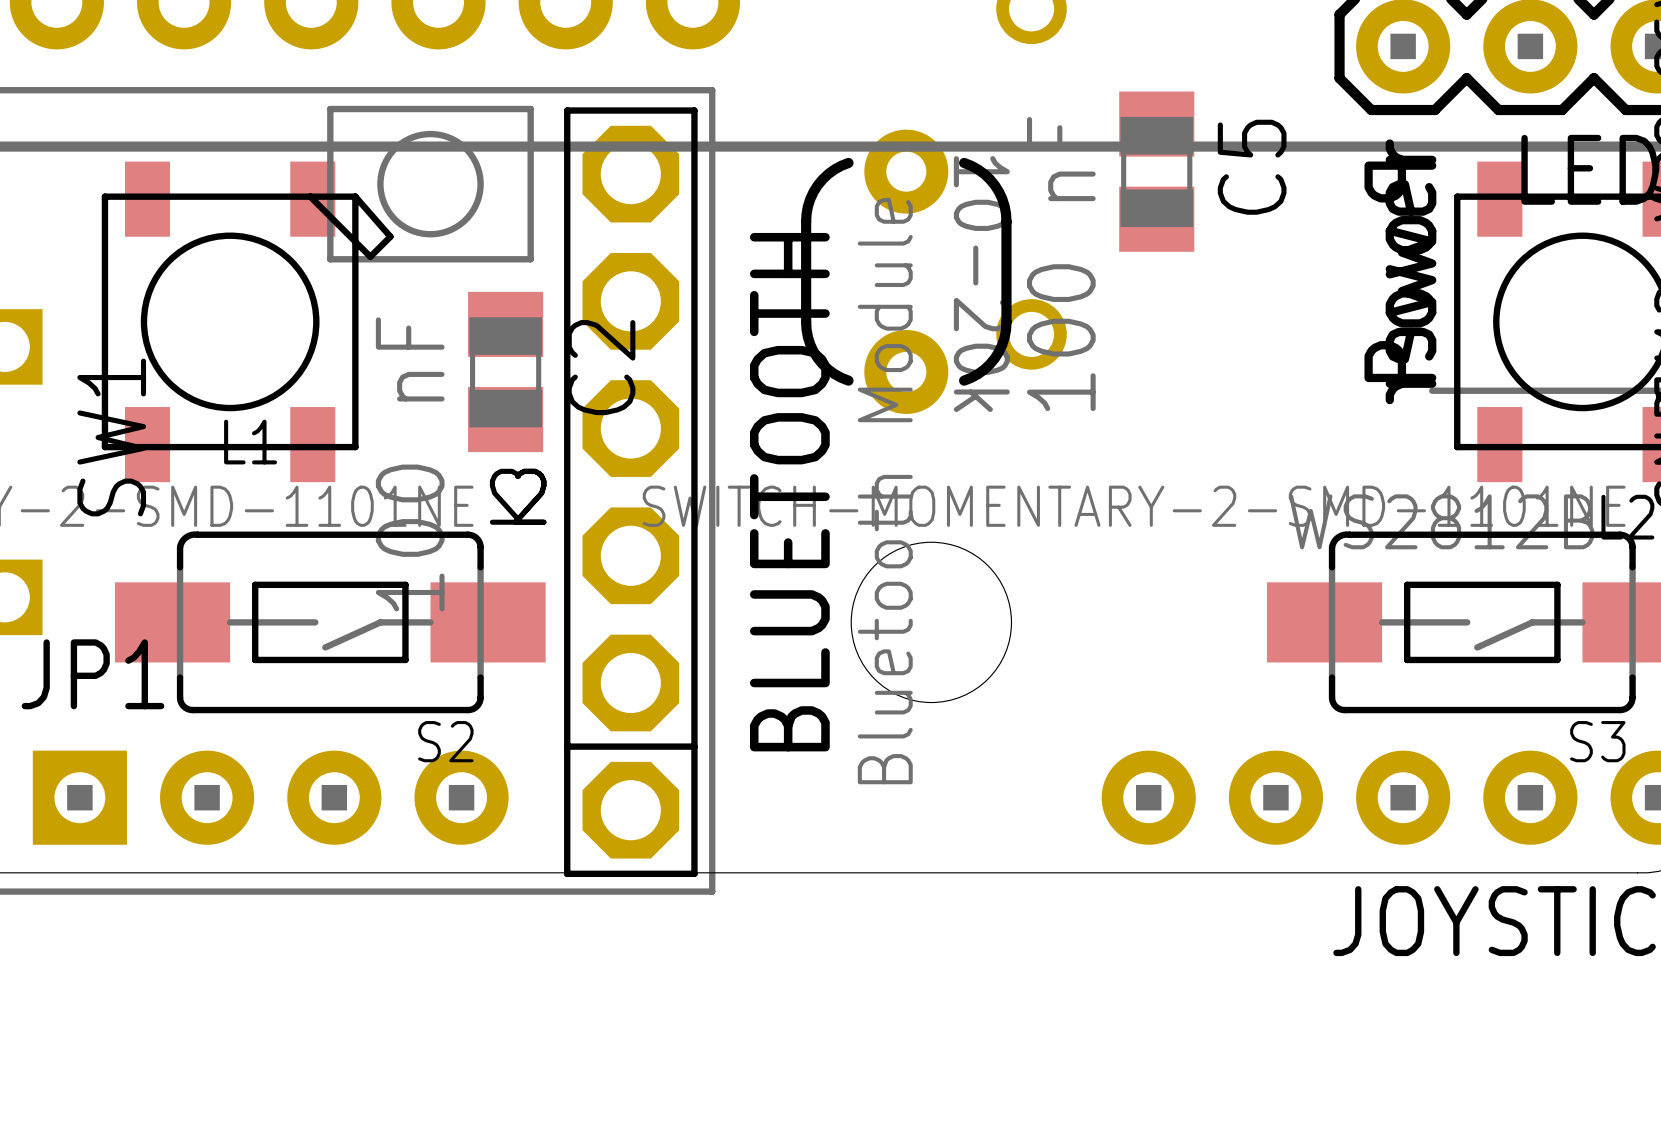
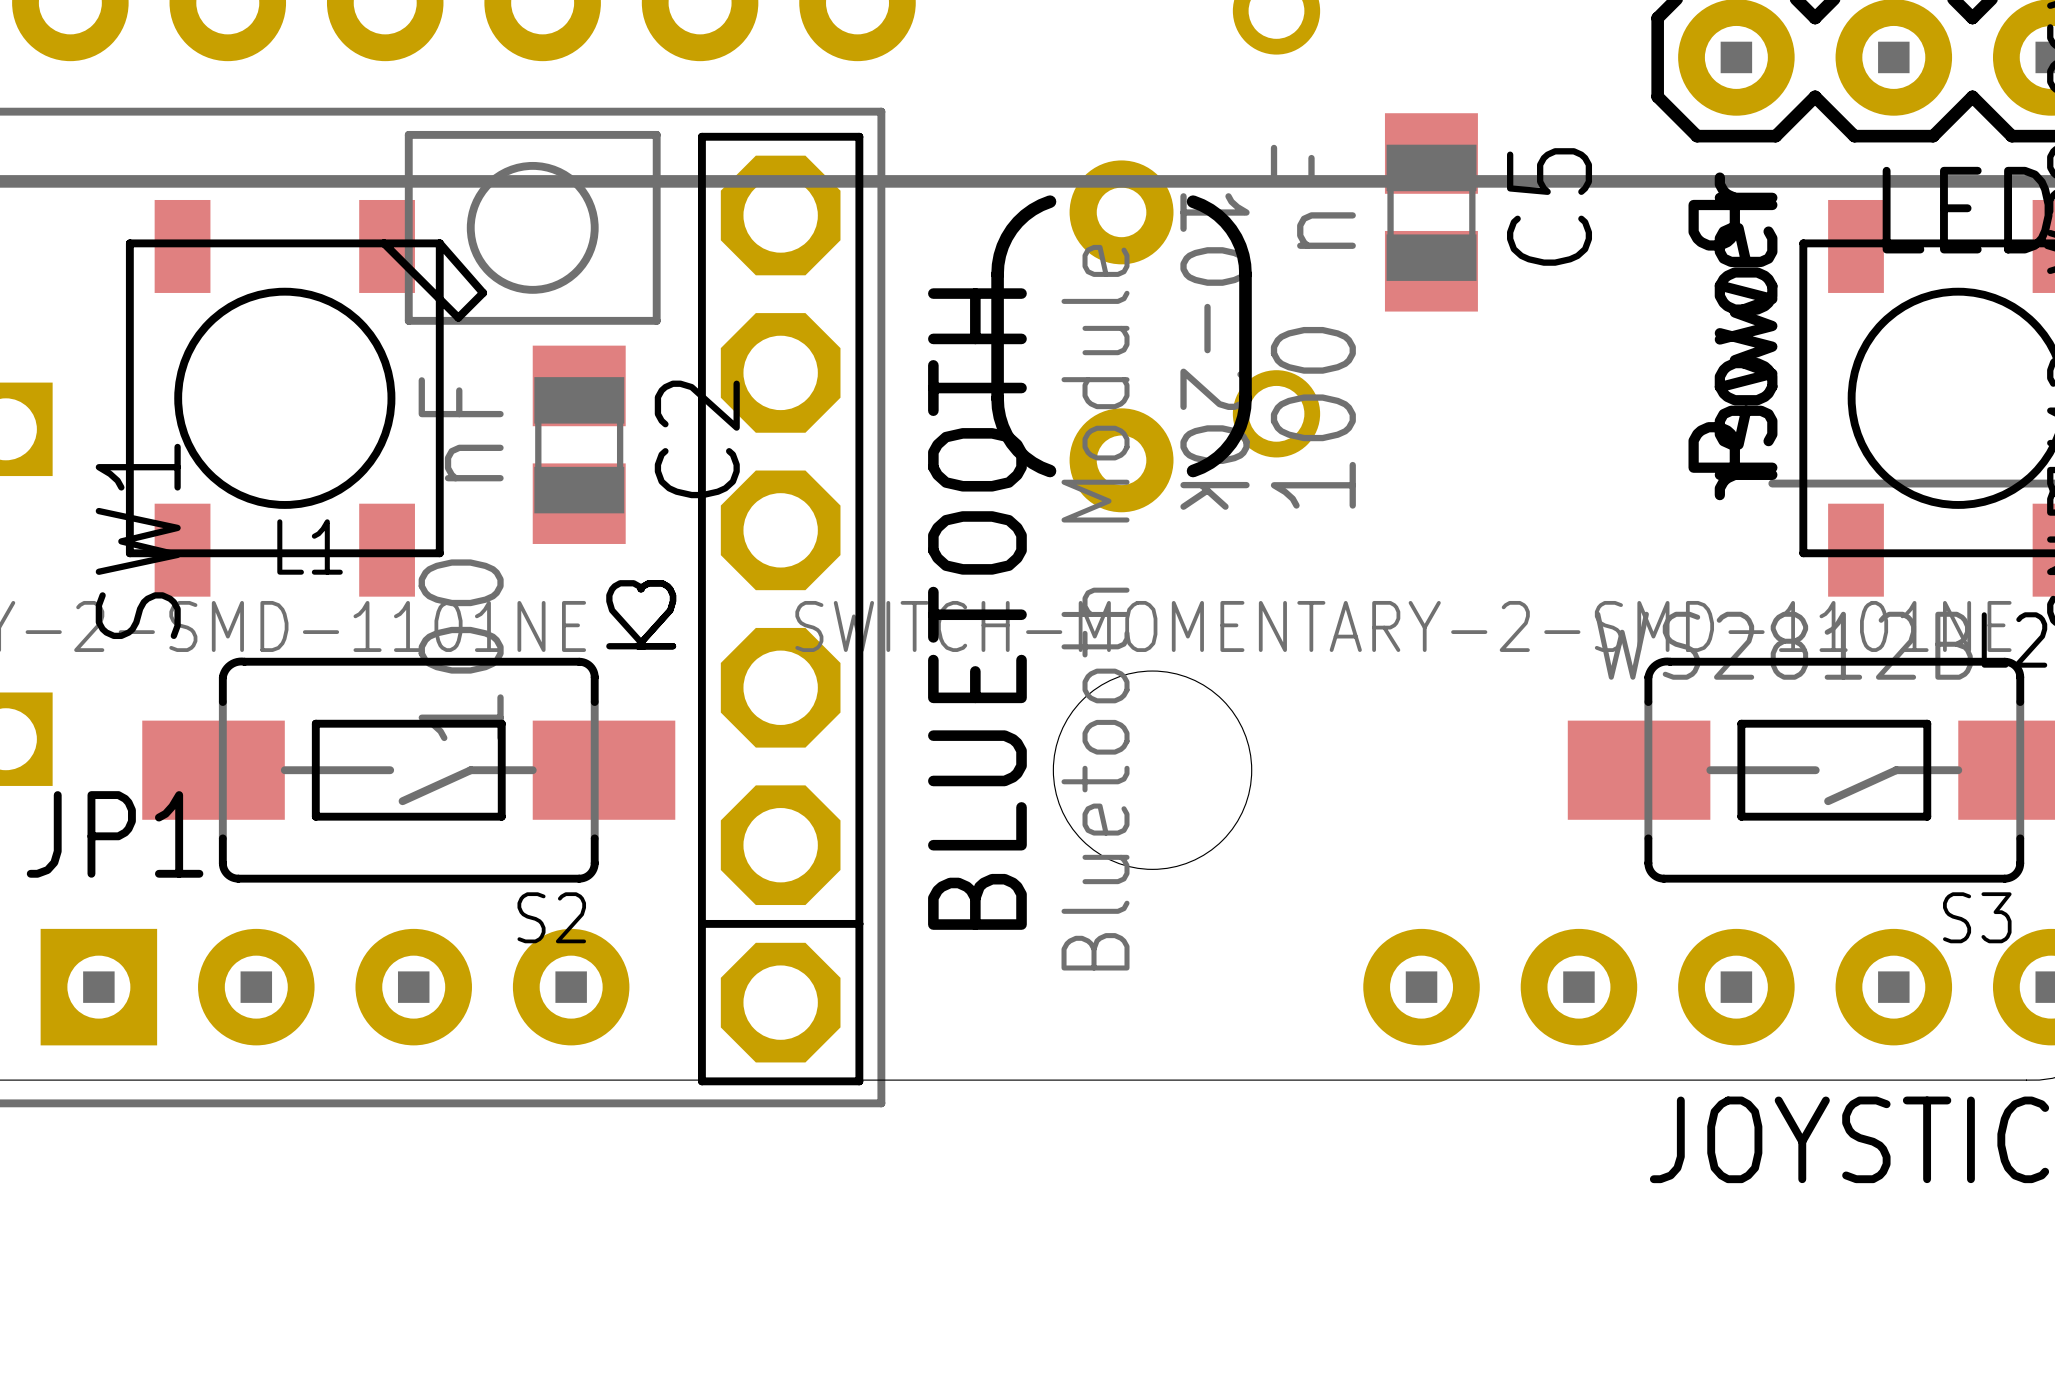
C2 position: (505, 371) -> (579, 444)

